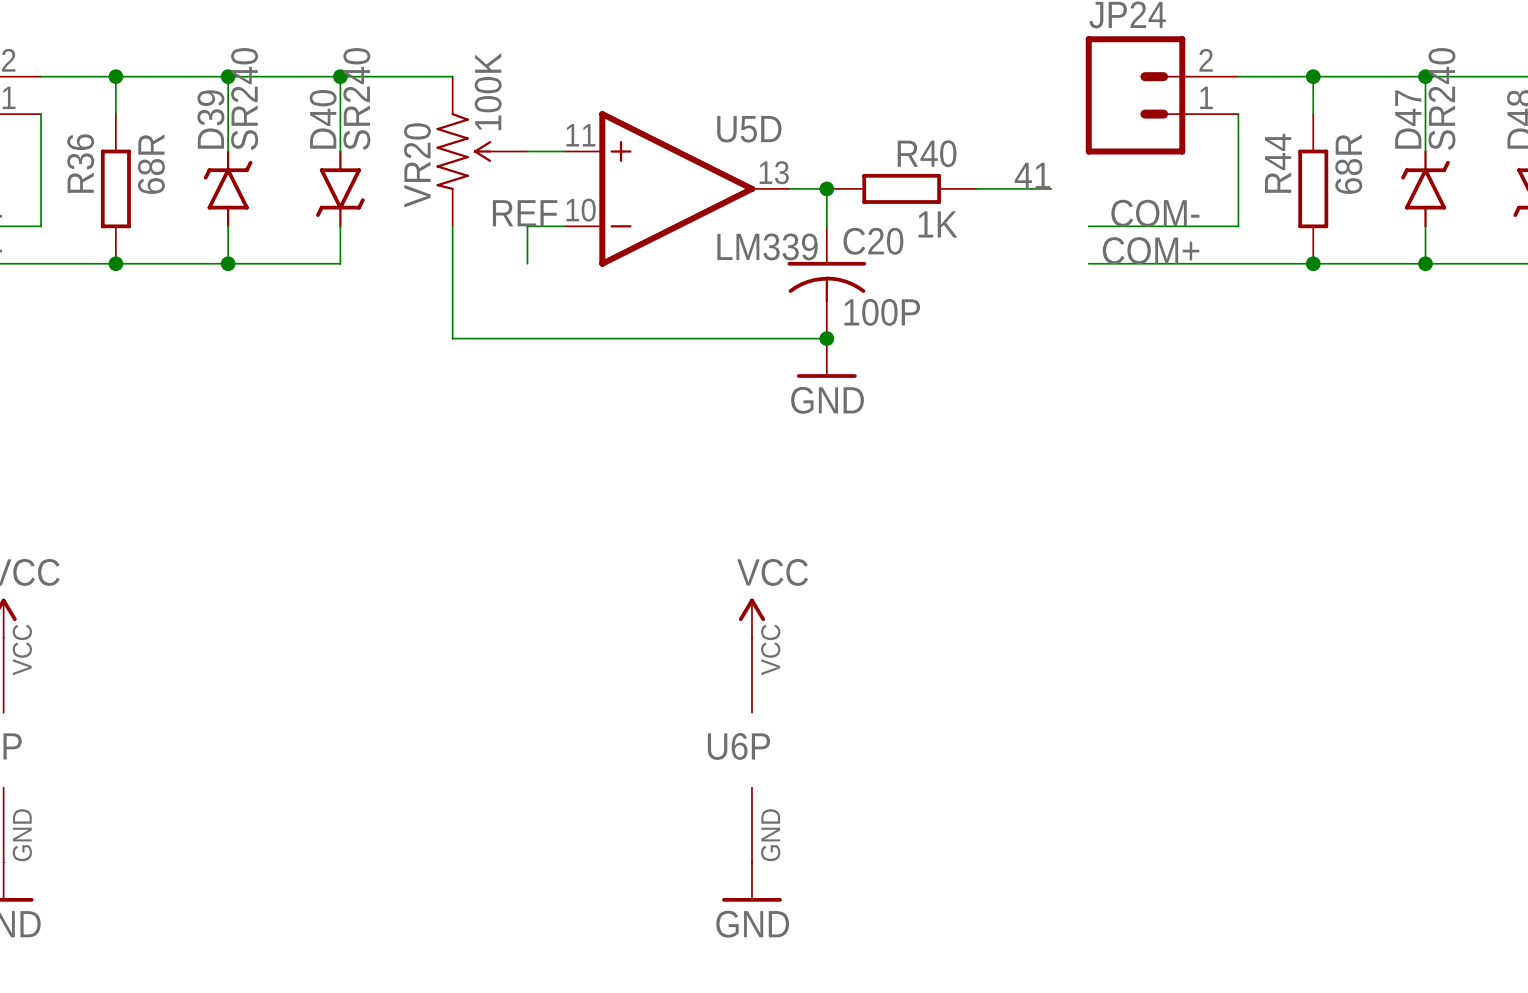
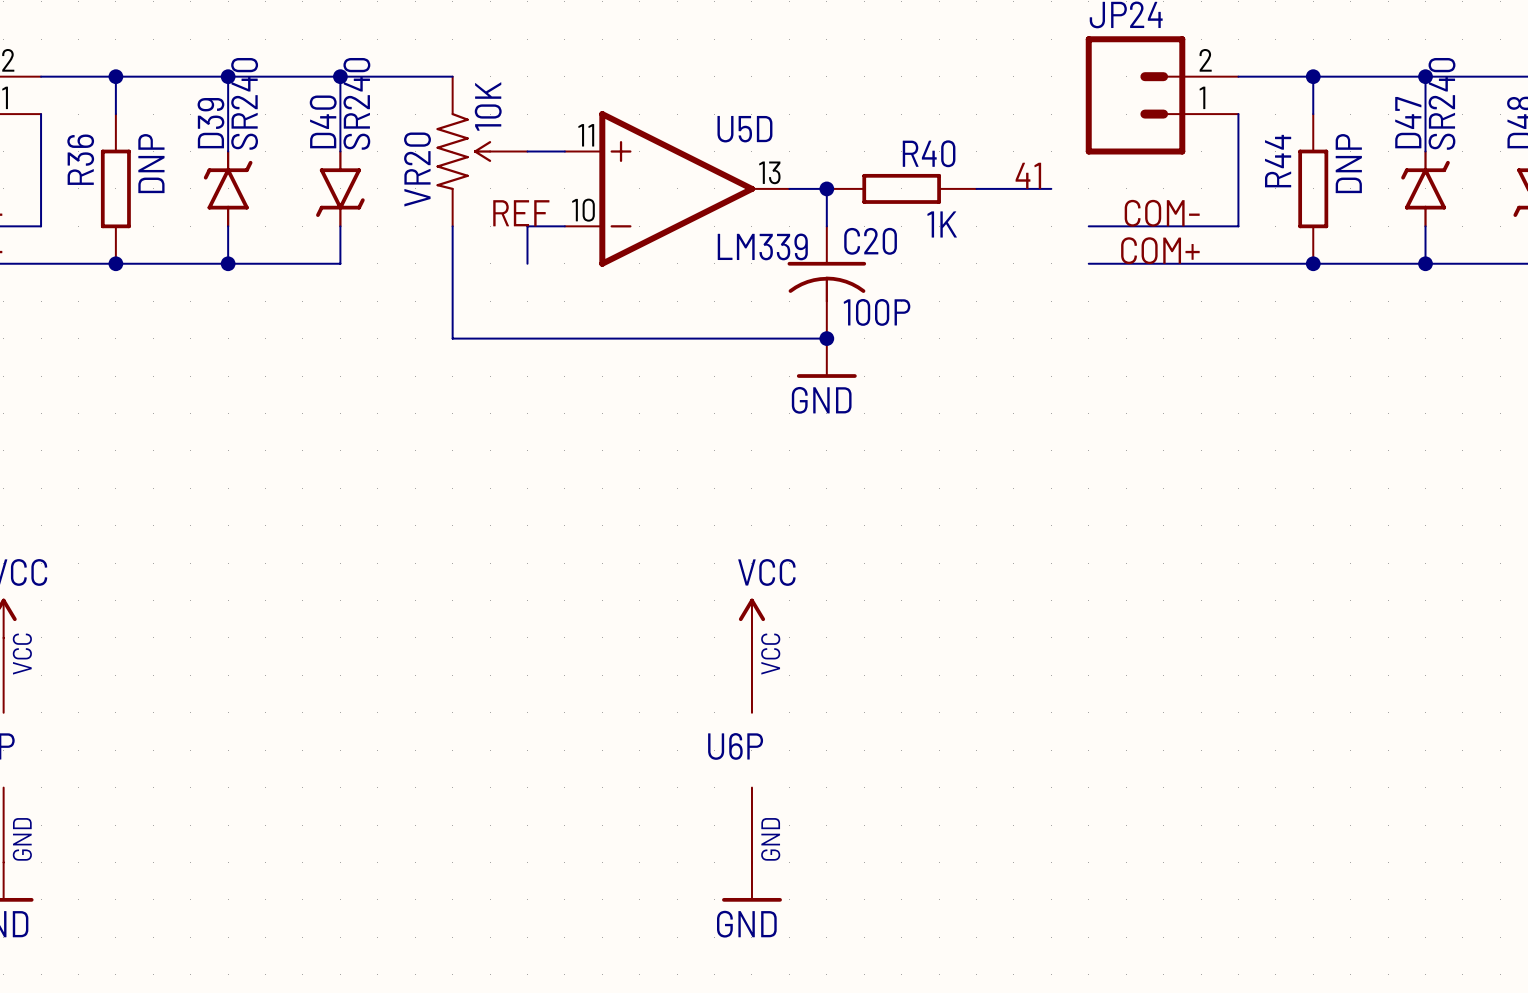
VR20 value: 100K (488, 91) -> 10K (488, 106)
R36 value: 68R (151, 164) -> DNP (151, 163)
R44 value: 68R (1348, 164) -> DNP (1348, 163)

